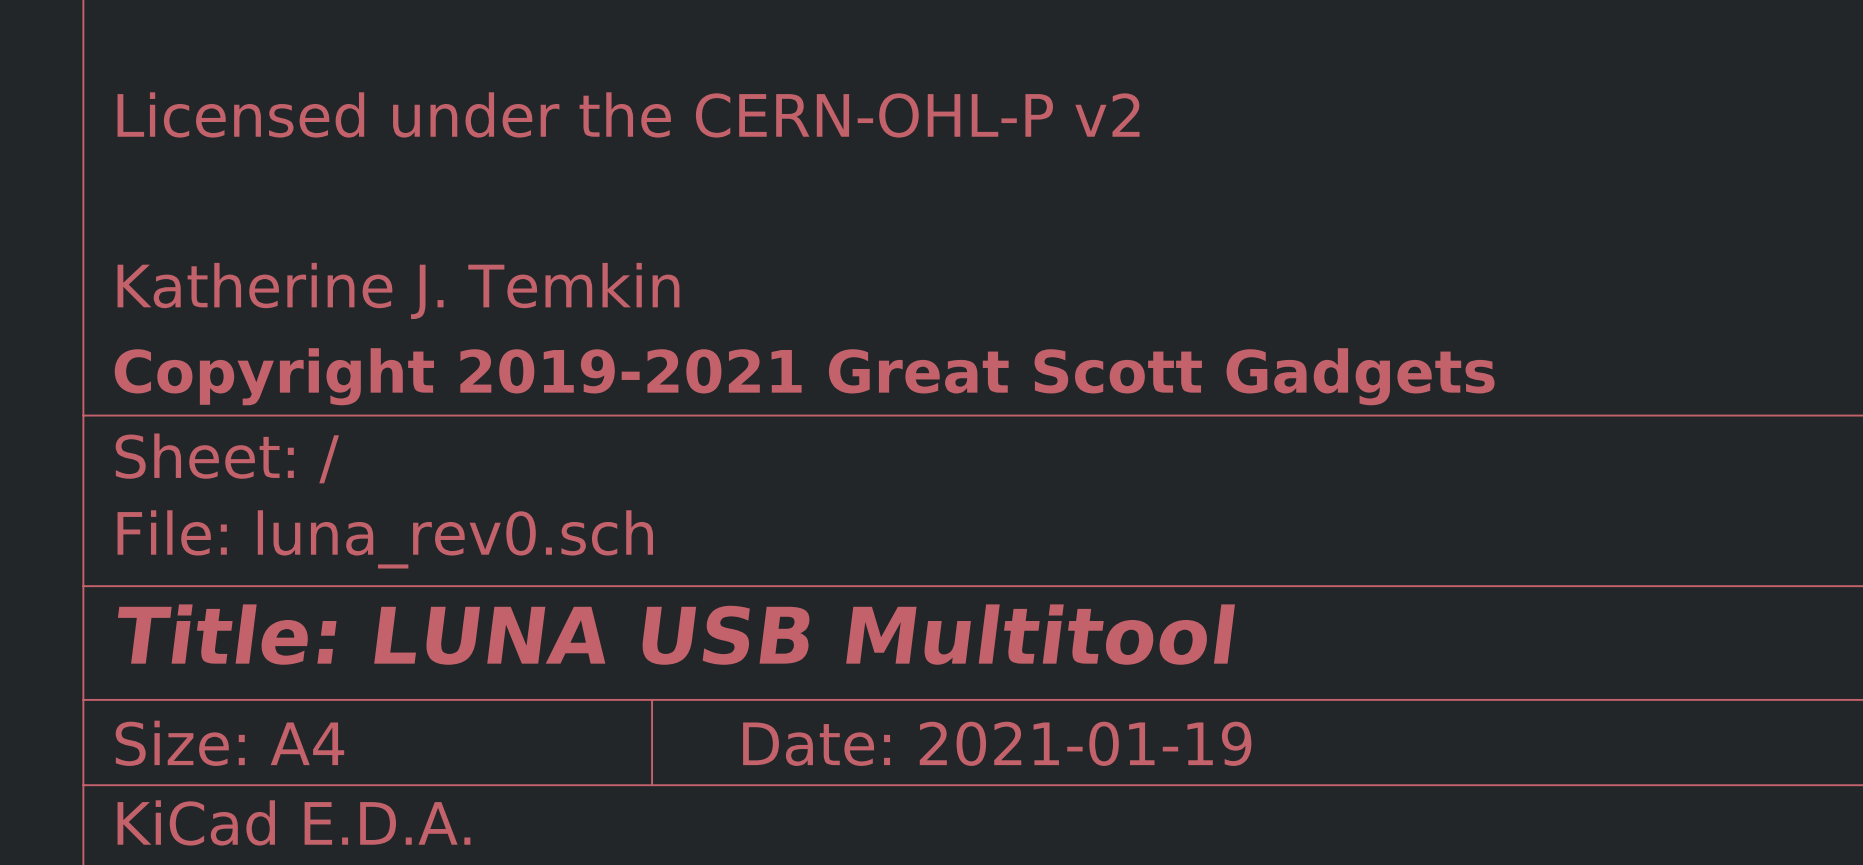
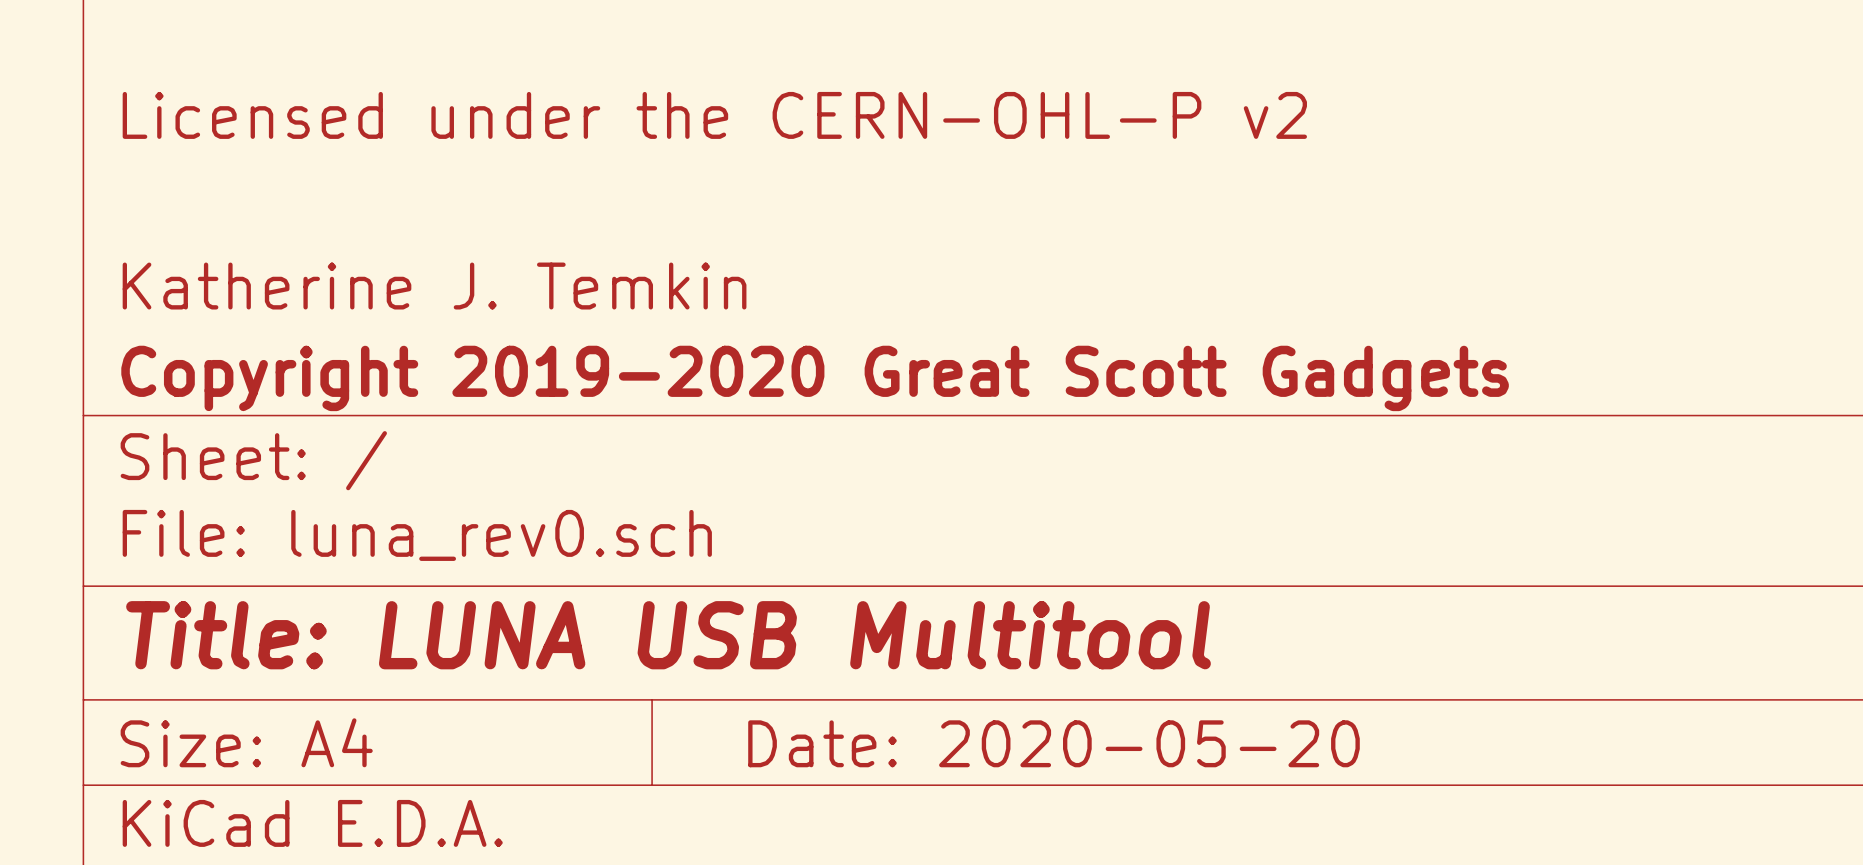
title block: Copyright 2019-2021 Great Scott Gadgets (804, 376) -> Copyright 2019-2020 Great Scott Gadgets (815, 378)
title block: Date: 2021-01-19 (997, 743) -> Date: 2020-05-20 (1053, 743)

